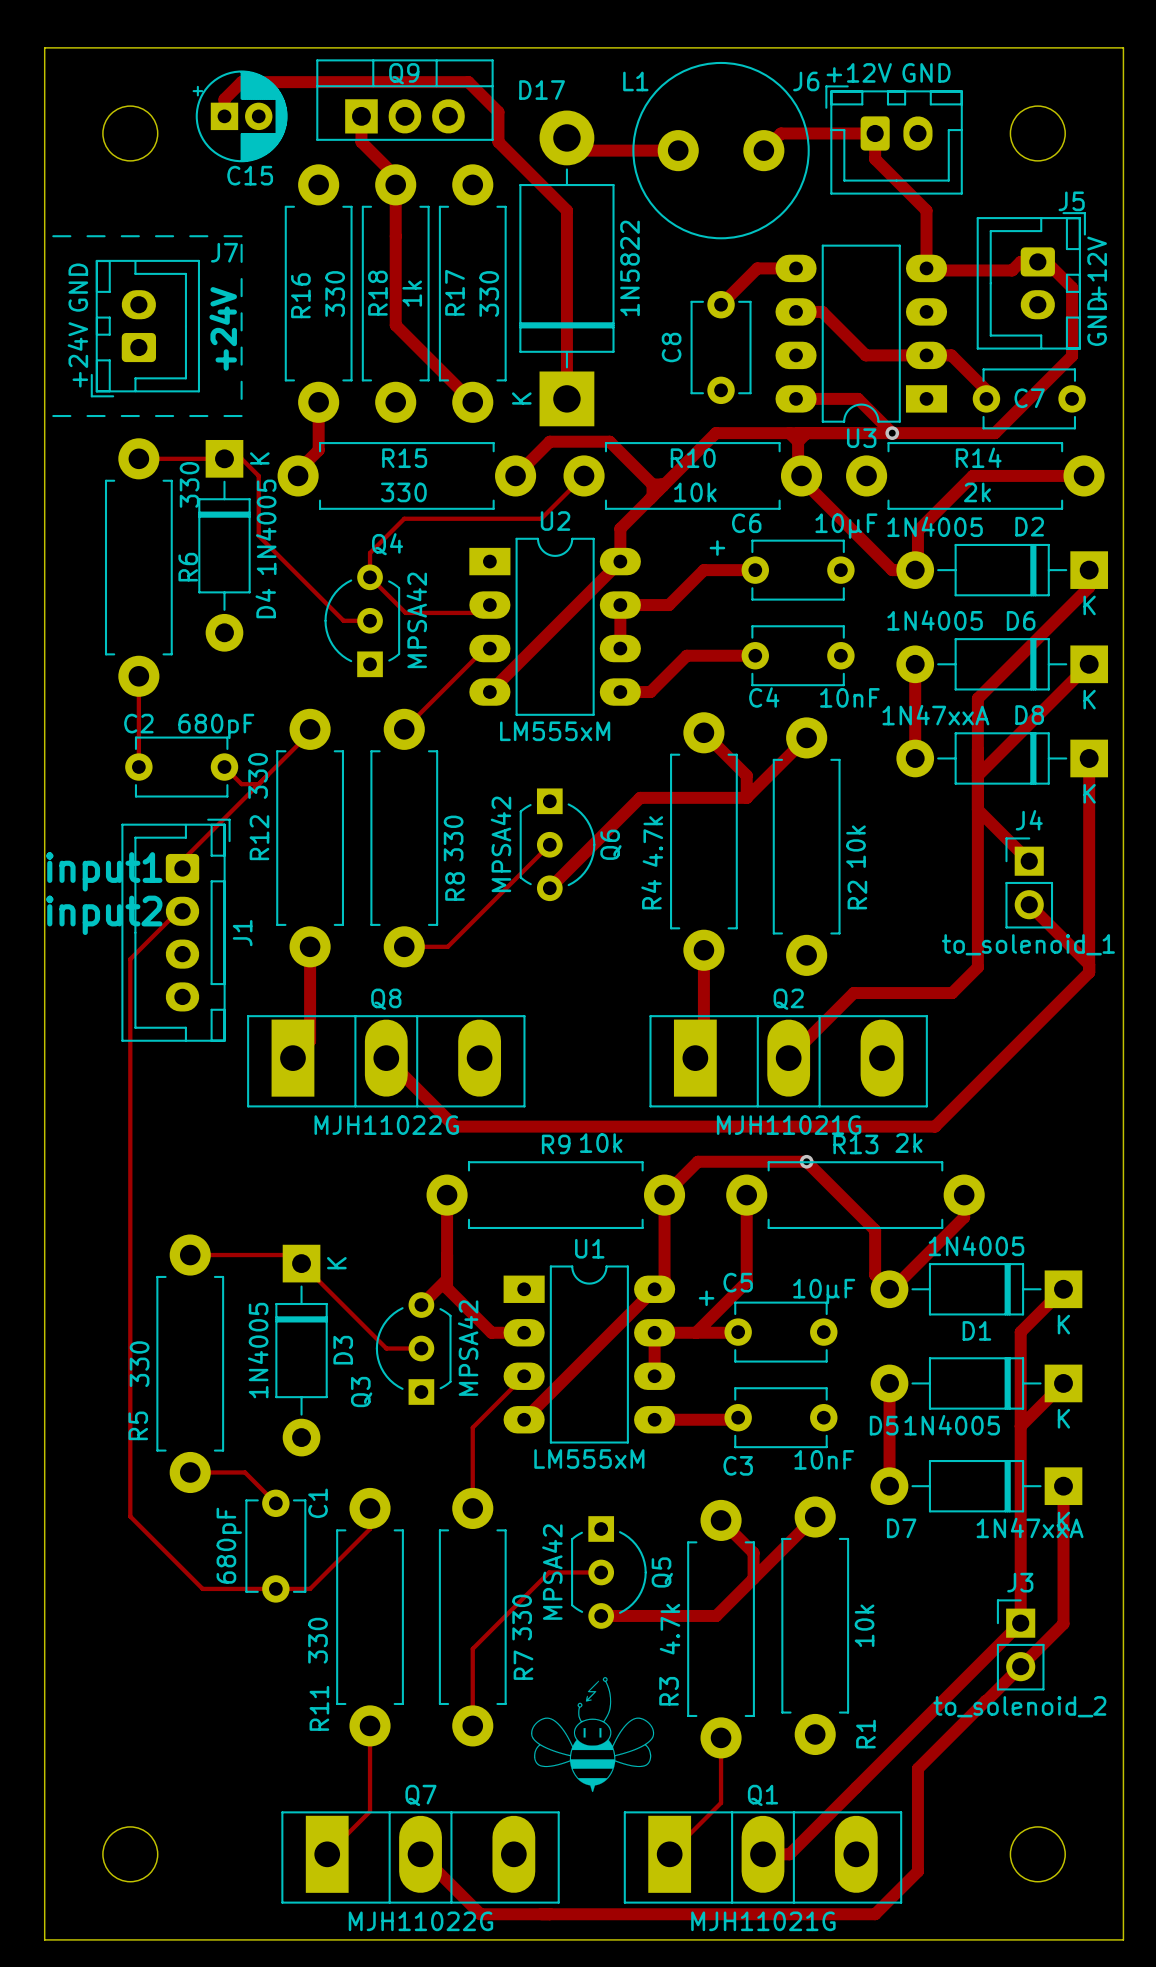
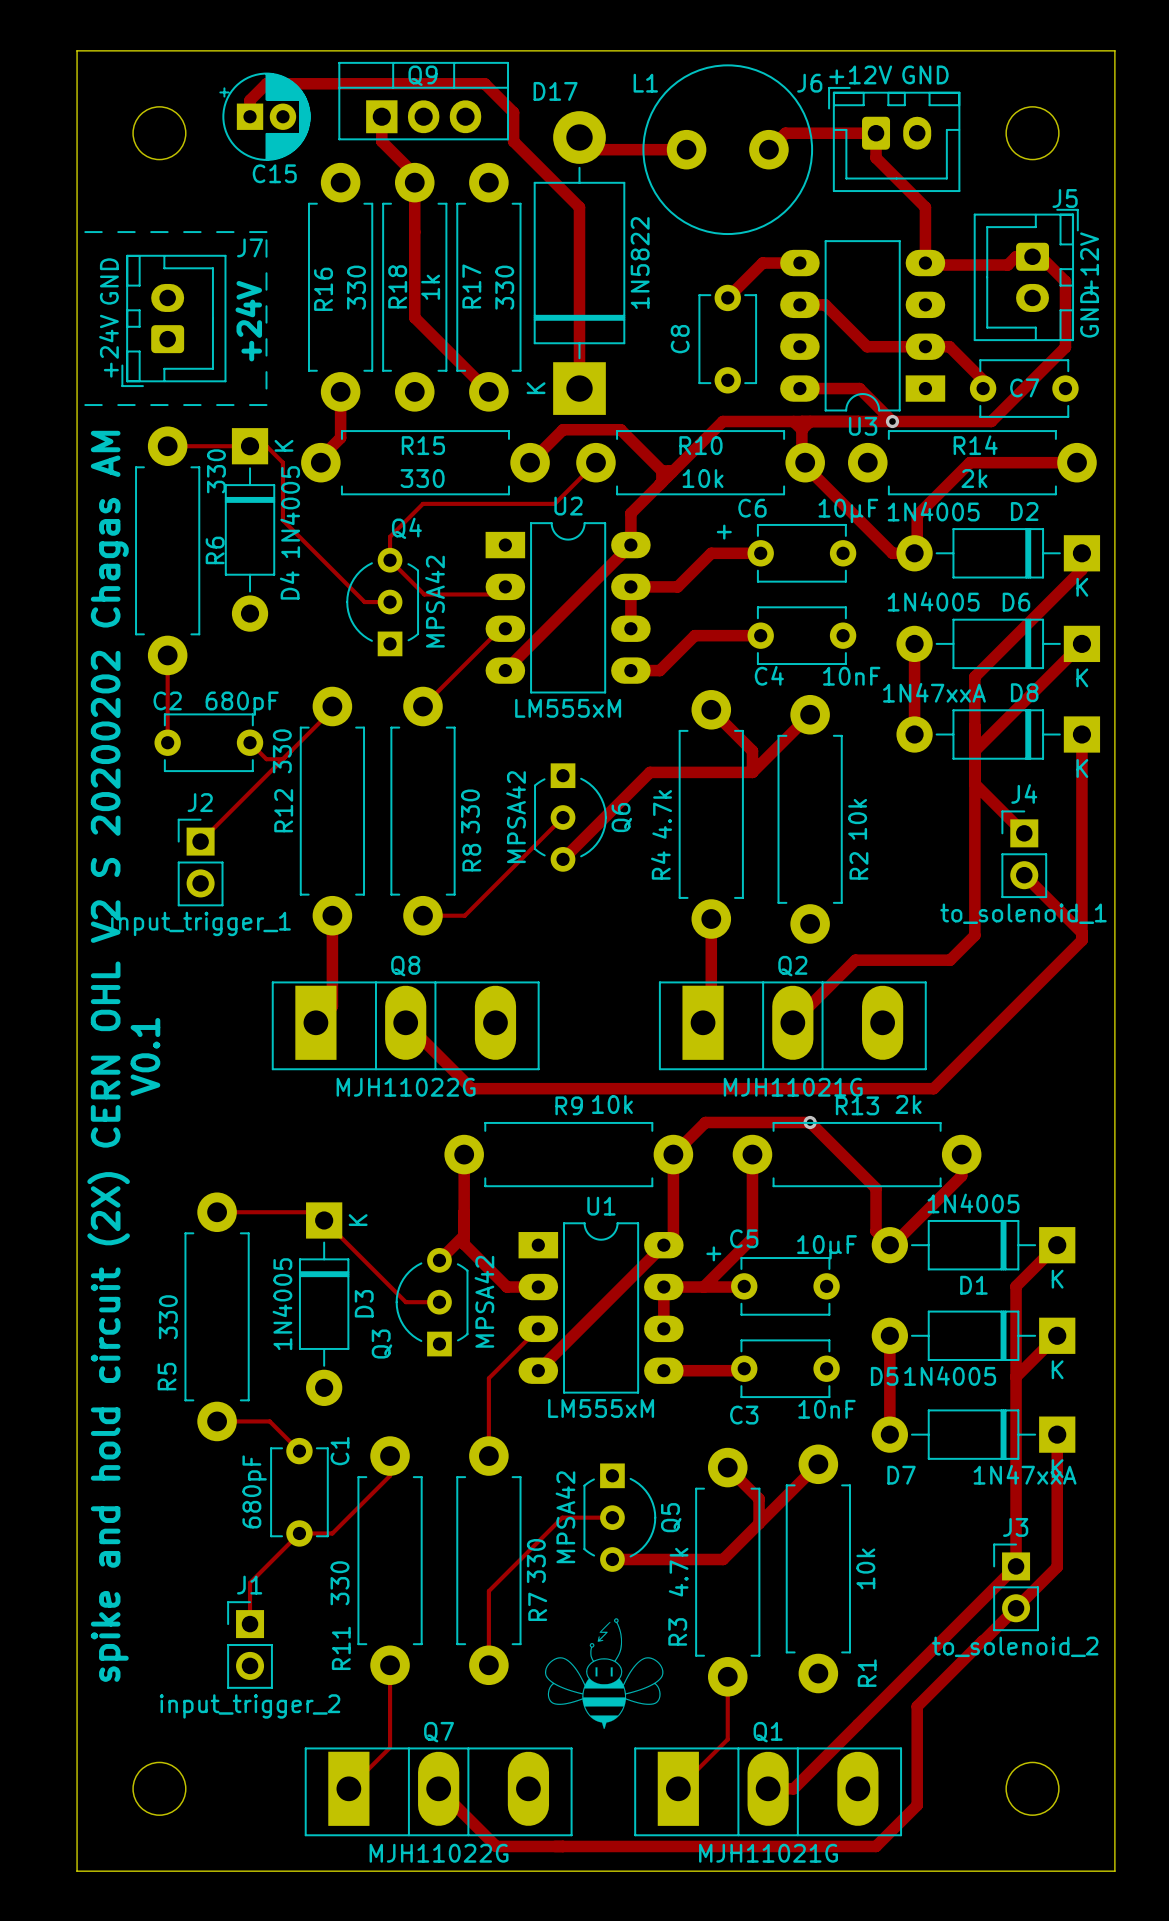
J1 footprint: [121, 818, 231, 1042] -> [227, 1601, 273, 1689]
text: input1 (104, 871) -> none
J2: none -> input_trigger_1 (200, 862)
text: input2 (104, 915) -> none
track: (173, 915) (130, 959) (130, 1516) (202, 1588) (275, 1588) -> (250, 1624) (250, 1582) (299, 1533)
J1 name position: J1 (242, 933) -> J1 (249, 1585)
text: none -> spike and hold circuit (2X) CERN OHL V2 S 20200202 Chagas AM (108, 1056)
text: none -> V0.1 (145, 1056)
J1 value: none -> input_trigger_2 (250, 1706)

